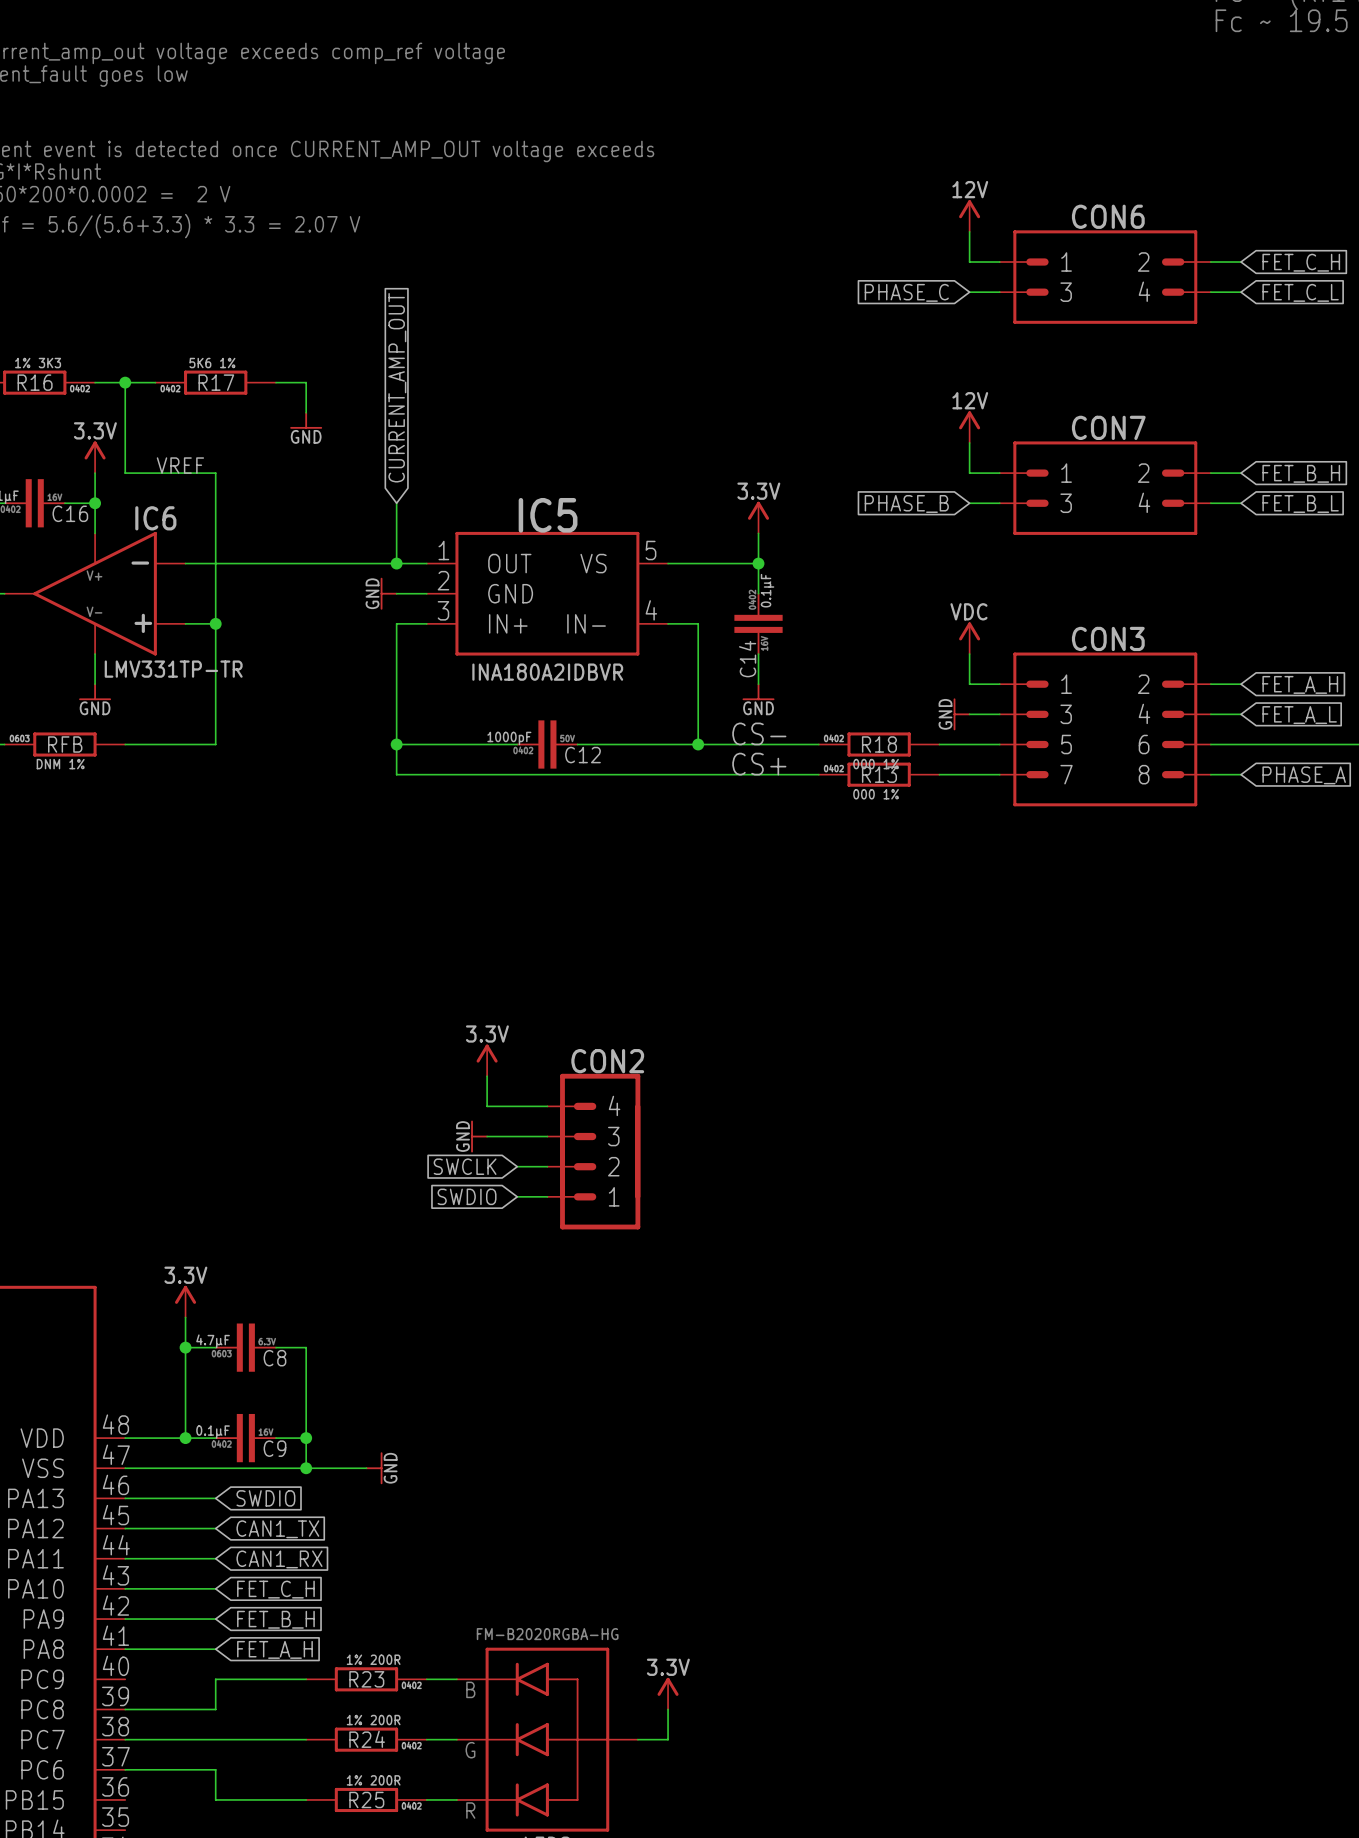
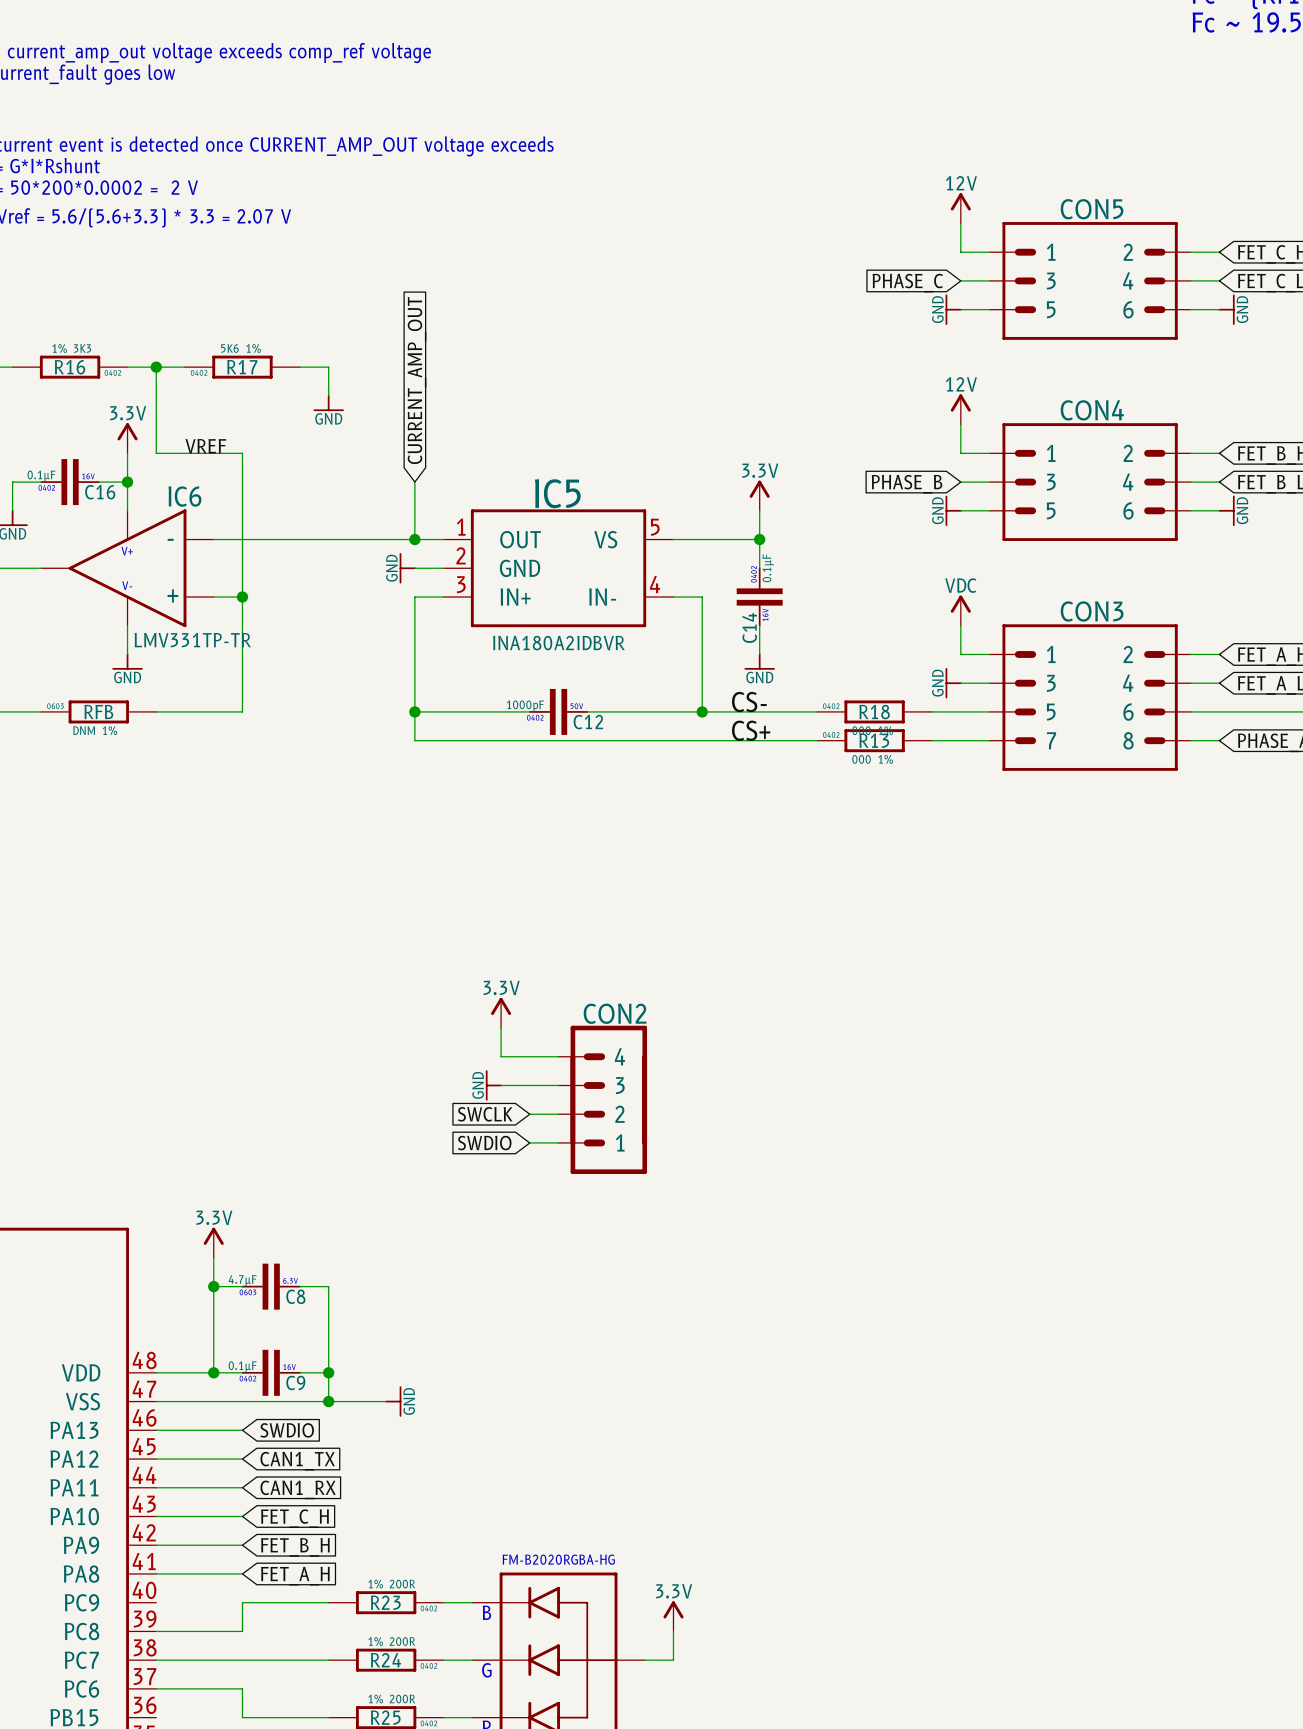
CON6: (1105, 277) -> none
CON5: none -> (1090, 280)
power symbol: none -> GND (953, 309)
wire: none -> (960, 309) (989, 309)
wire: none -> (1190, 309) (1219, 309)
power symbol: none -> GND (1226, 309)
CON7: (1105, 488) -> none
CON4: none -> (1090, 482)
power symbol: none -> GND (953, 510)
wire: none -> (960, 510) (989, 510)
wire: none -> (1190, 510) (1219, 510)
power symbol: none -> GND (1226, 510)

